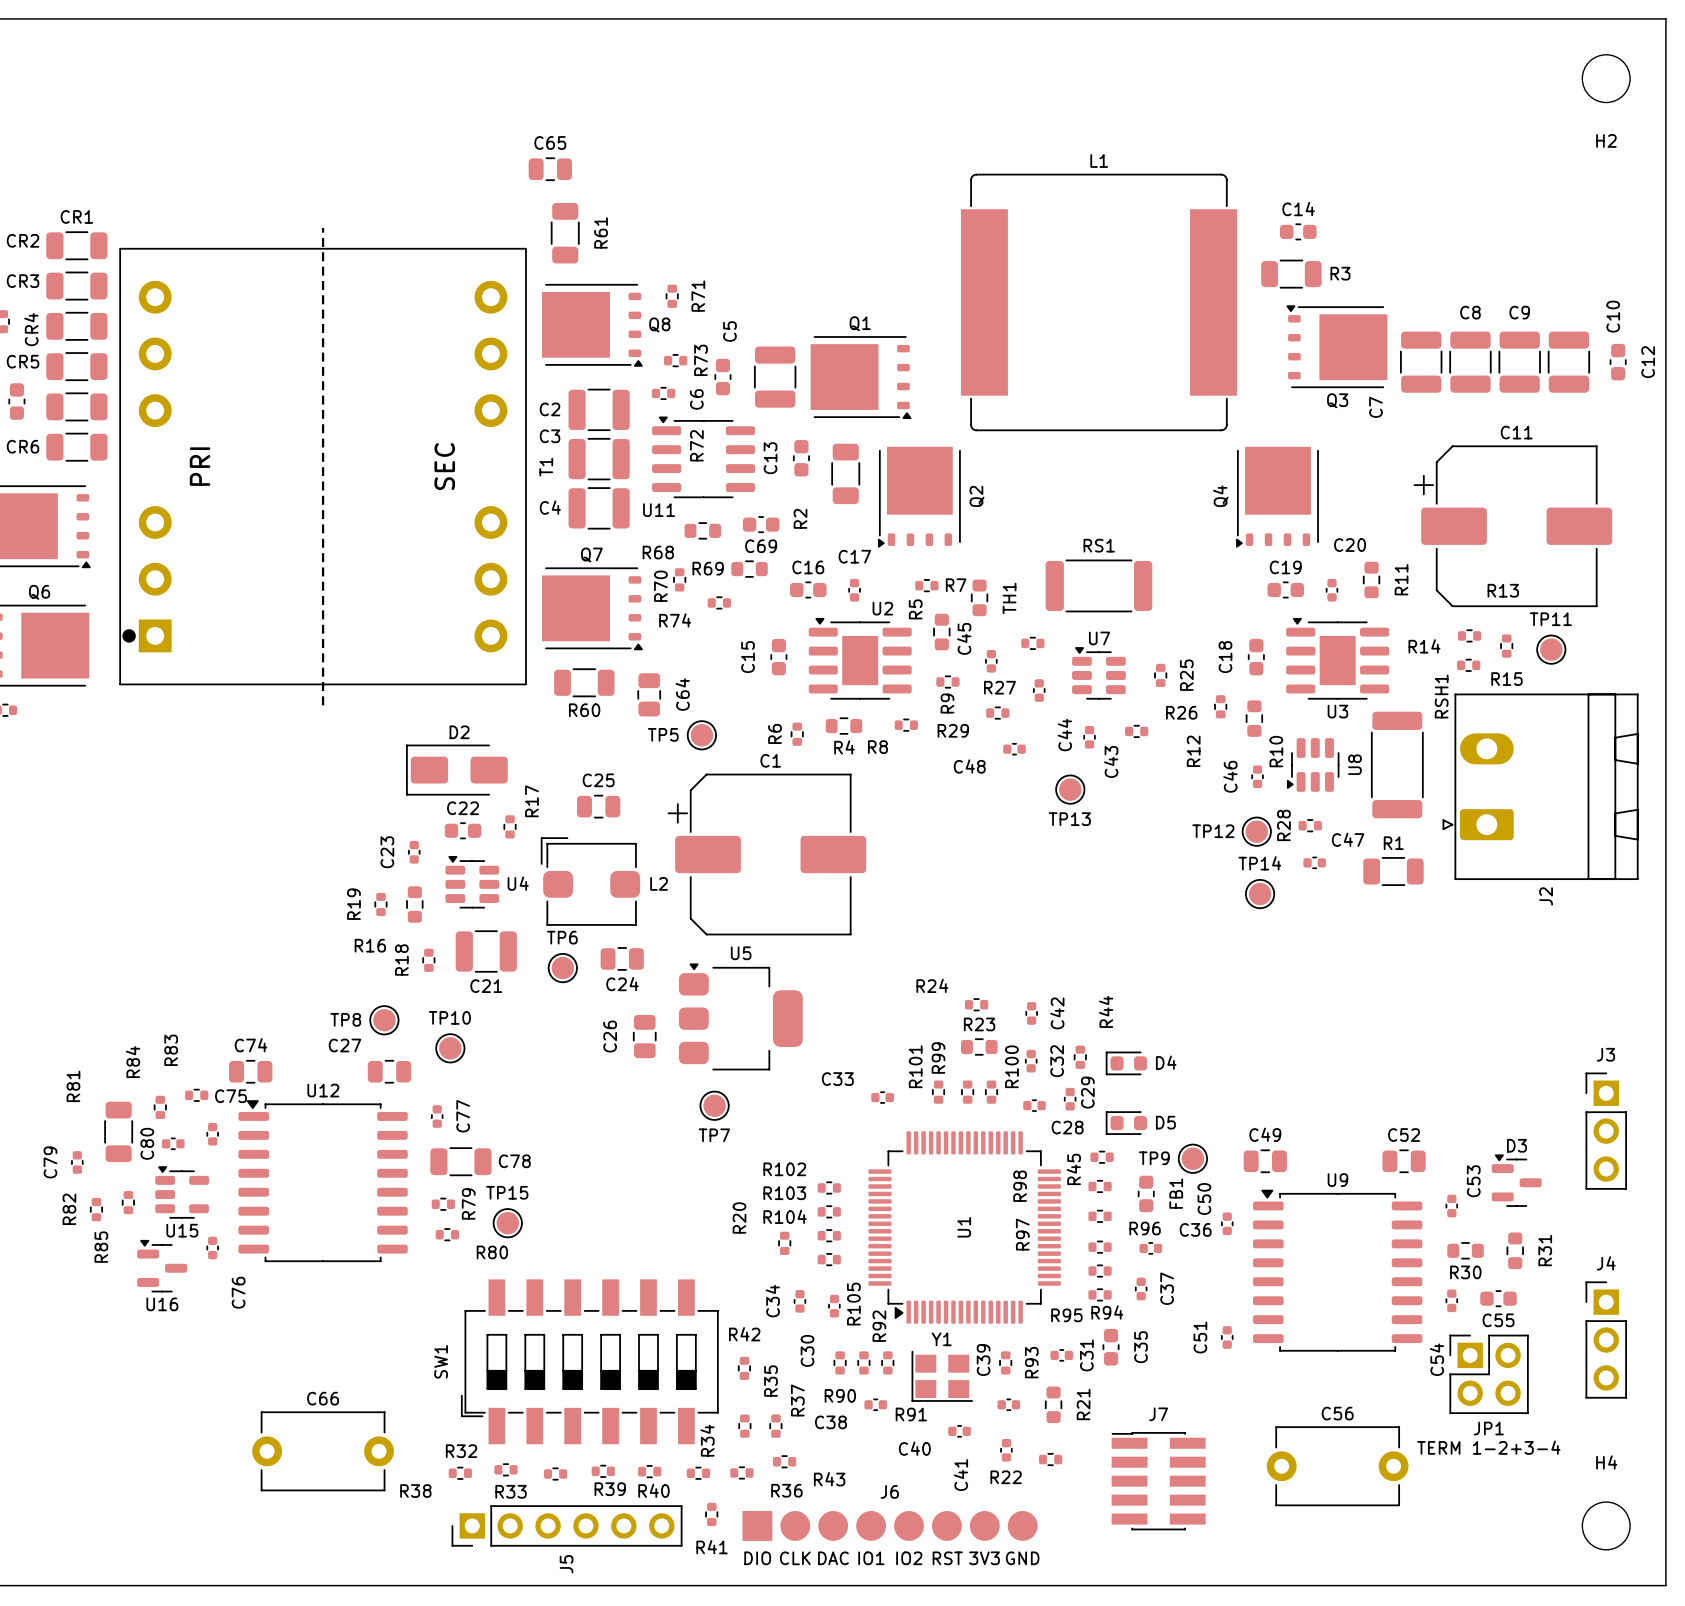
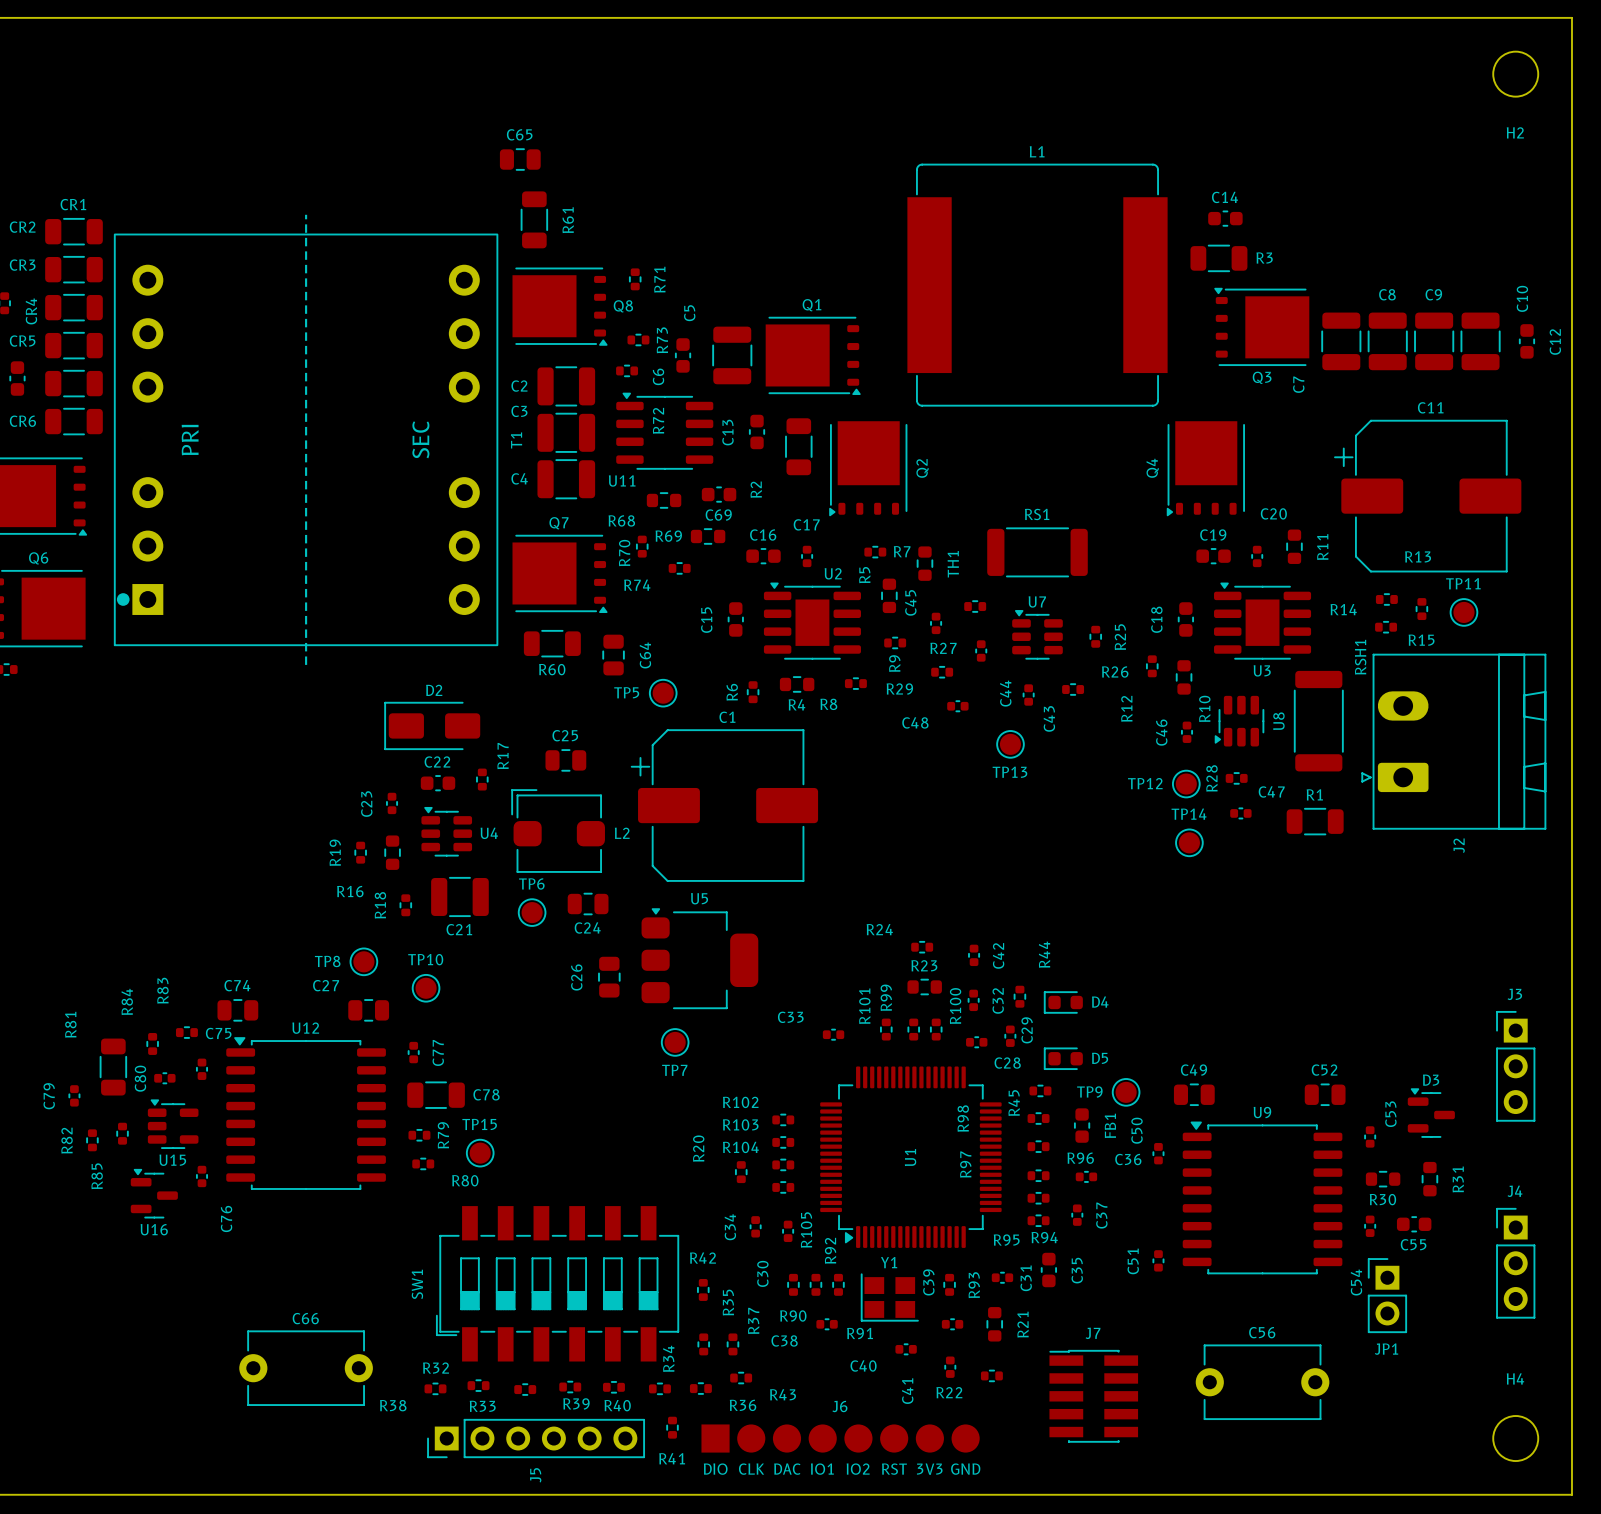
JP1 footprint: [1449, 1334, 1529, 1415] -> [1367, 1258, 1408, 1334]
text: TERM 1-2+3-4 (1488, 1447) -> none

